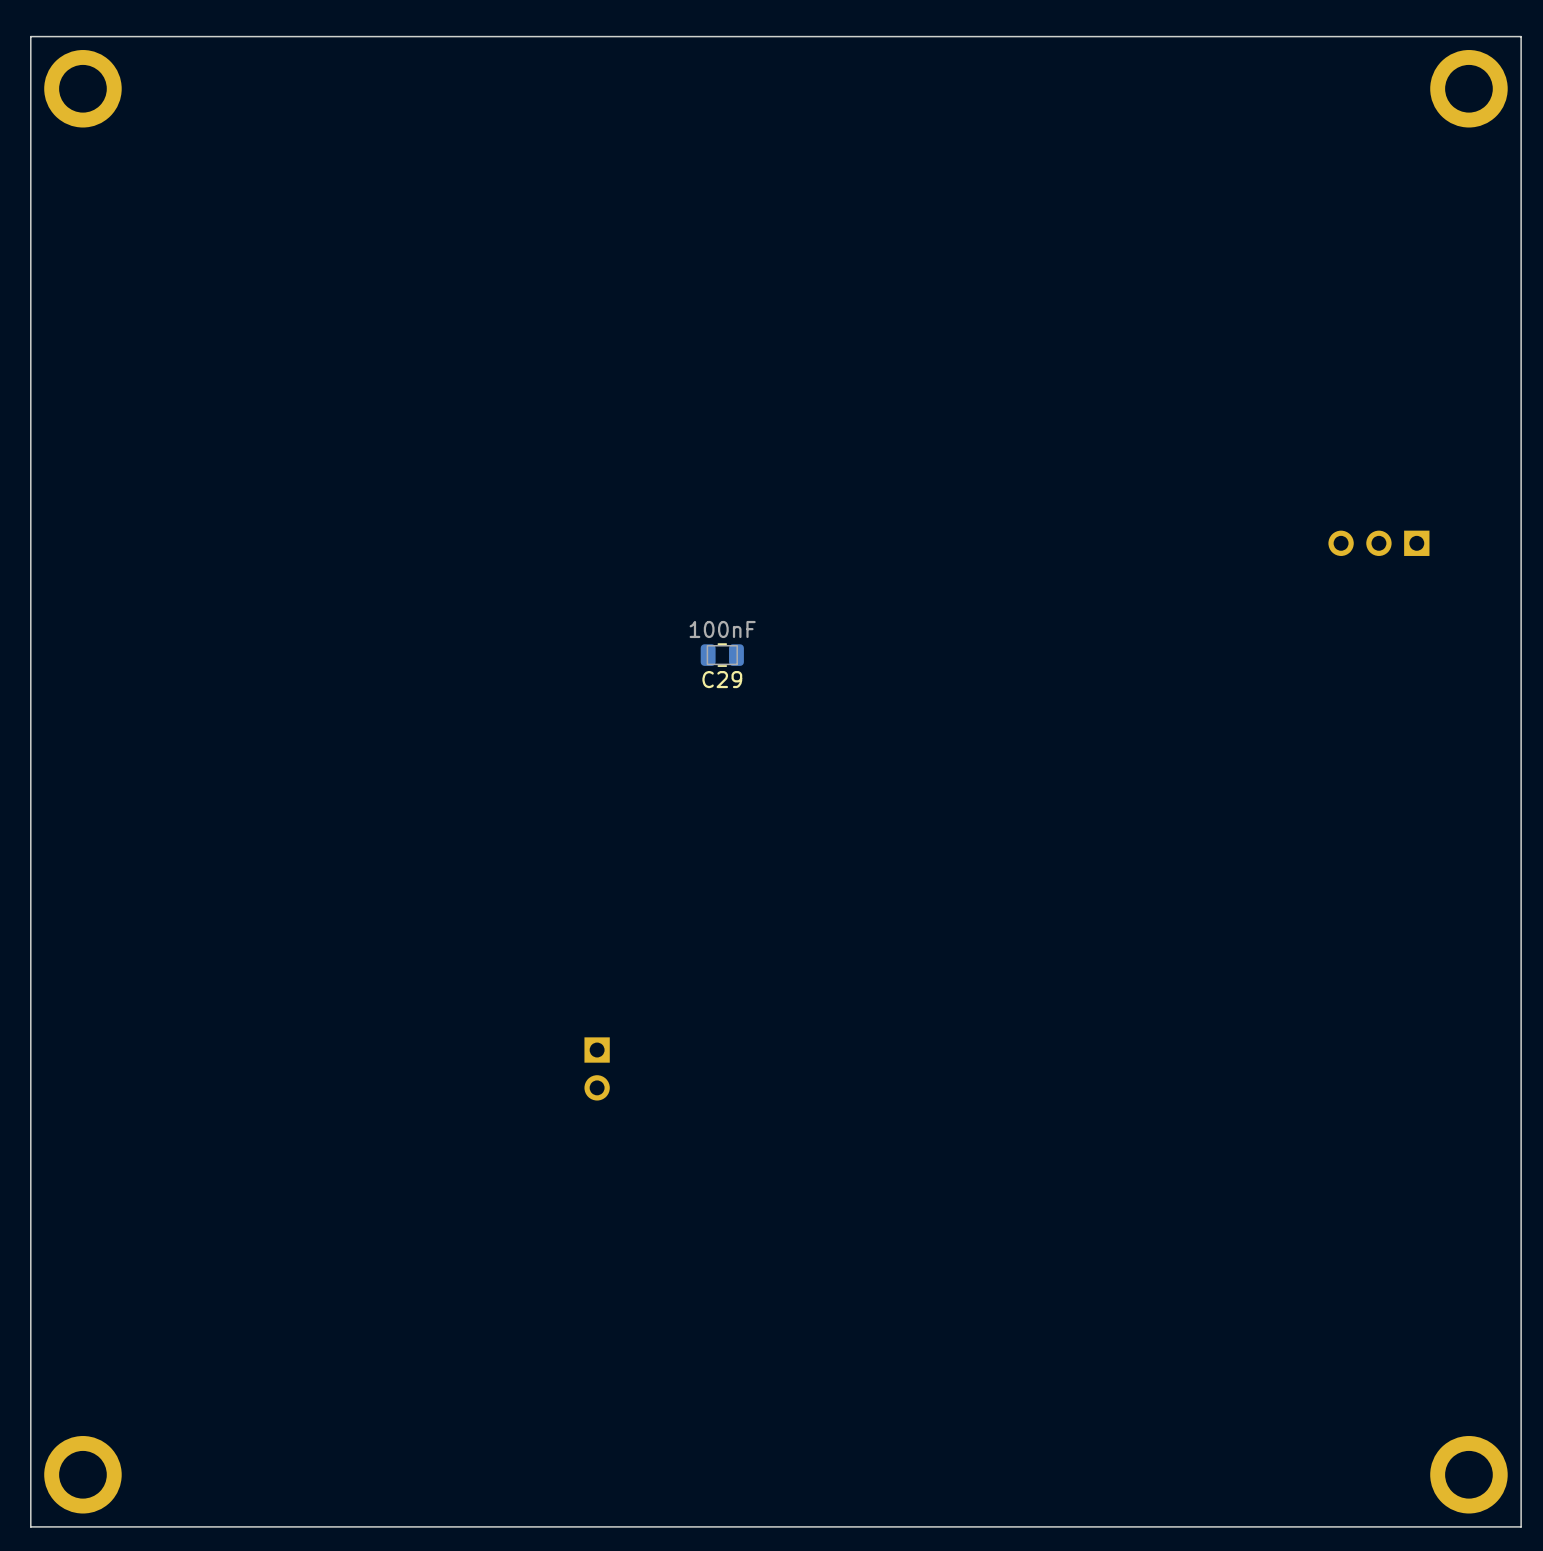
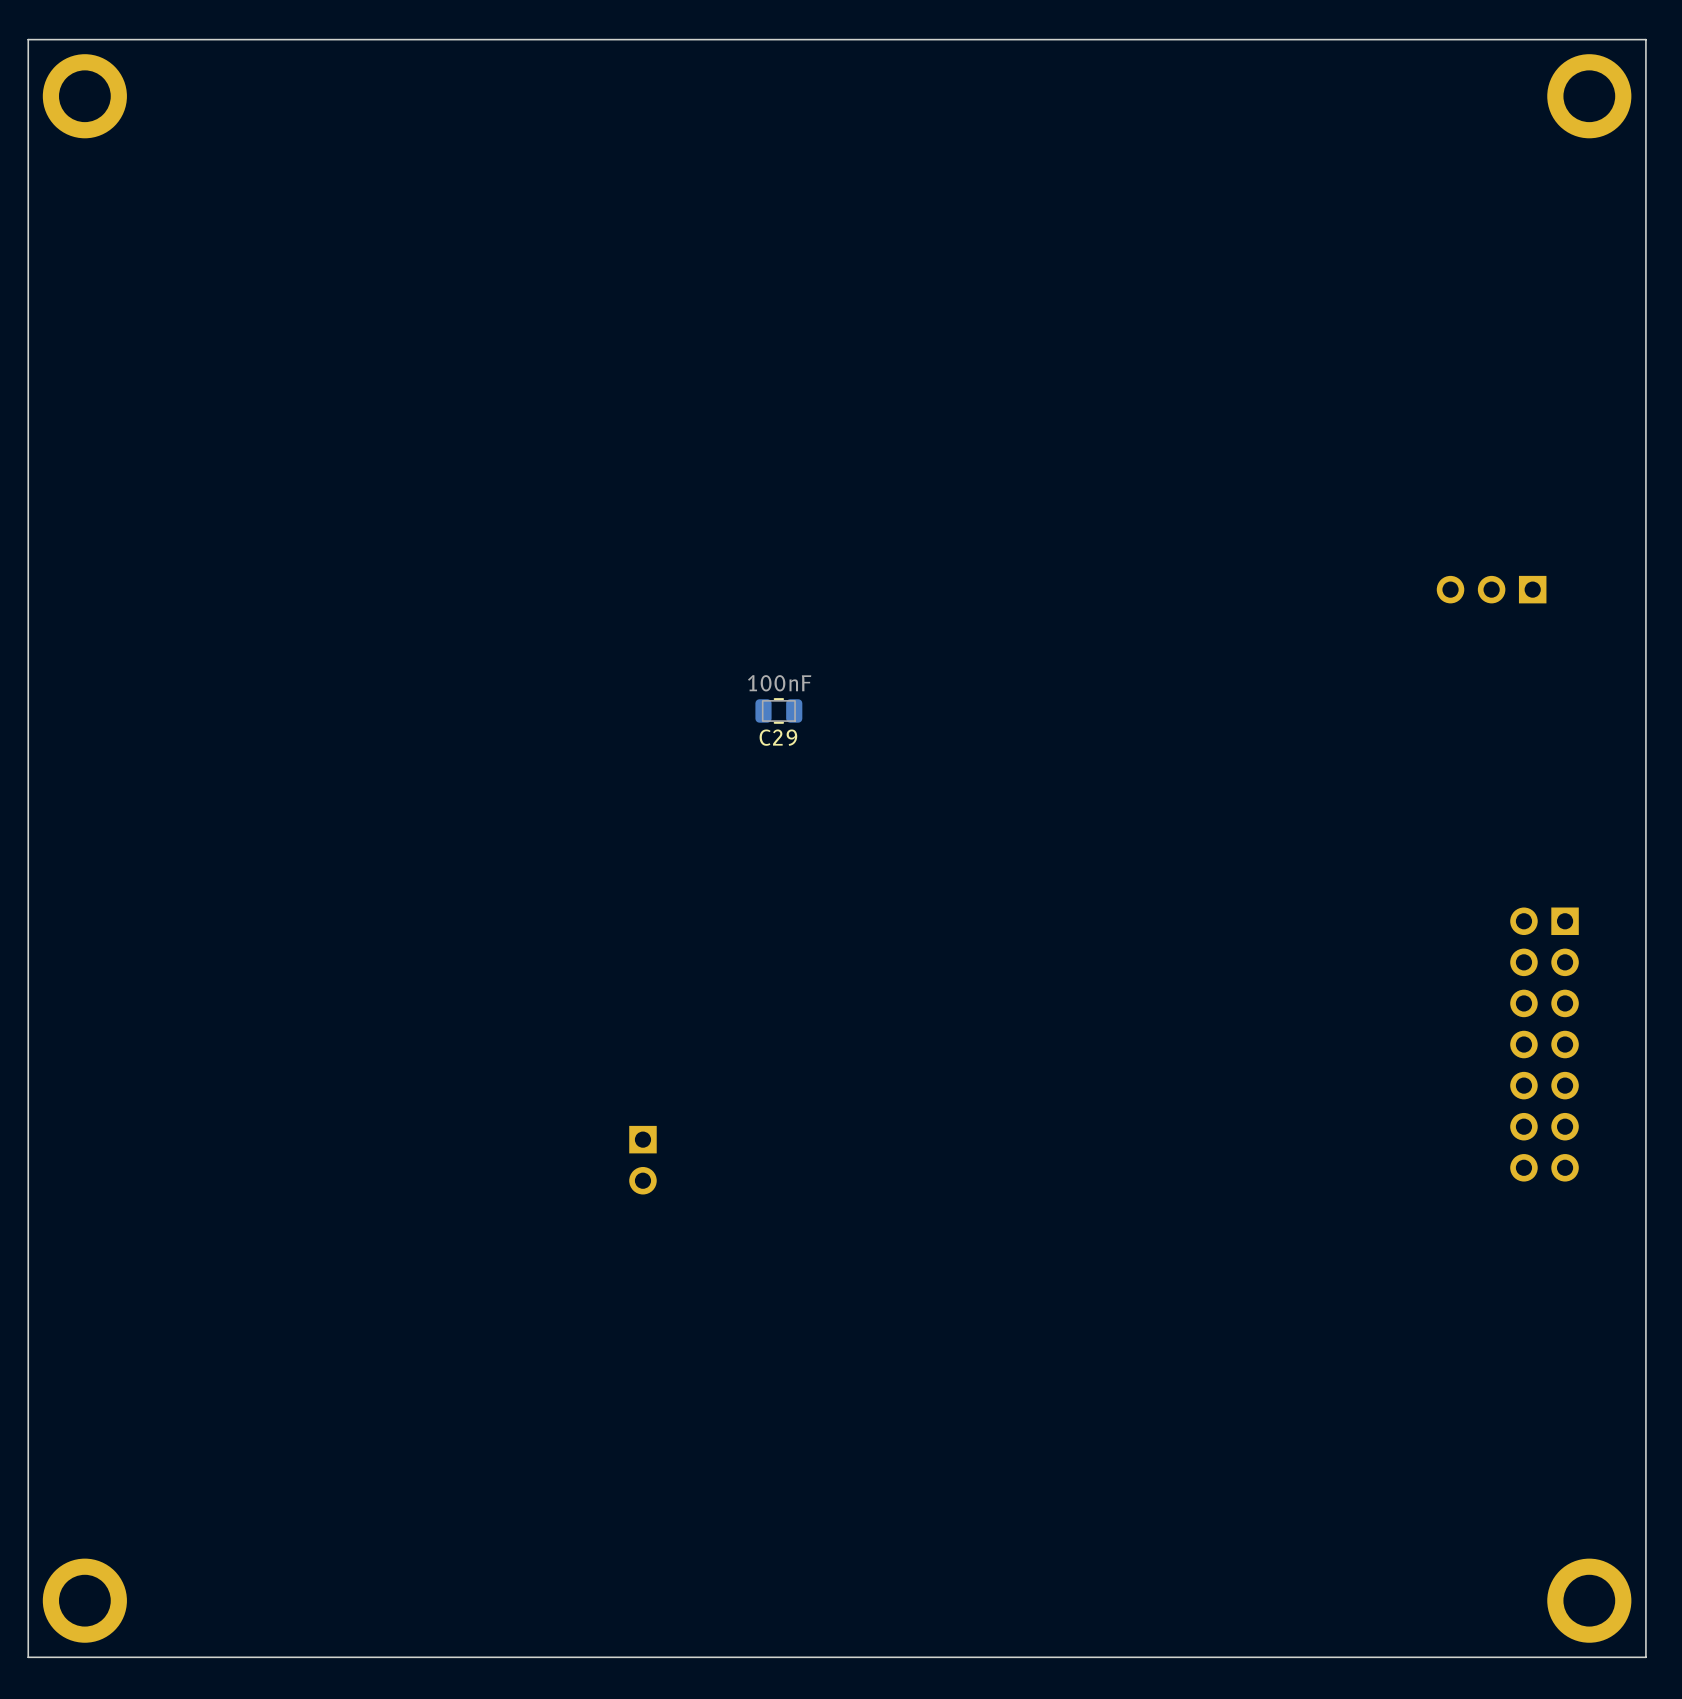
part: none -> (1544, 1044)

